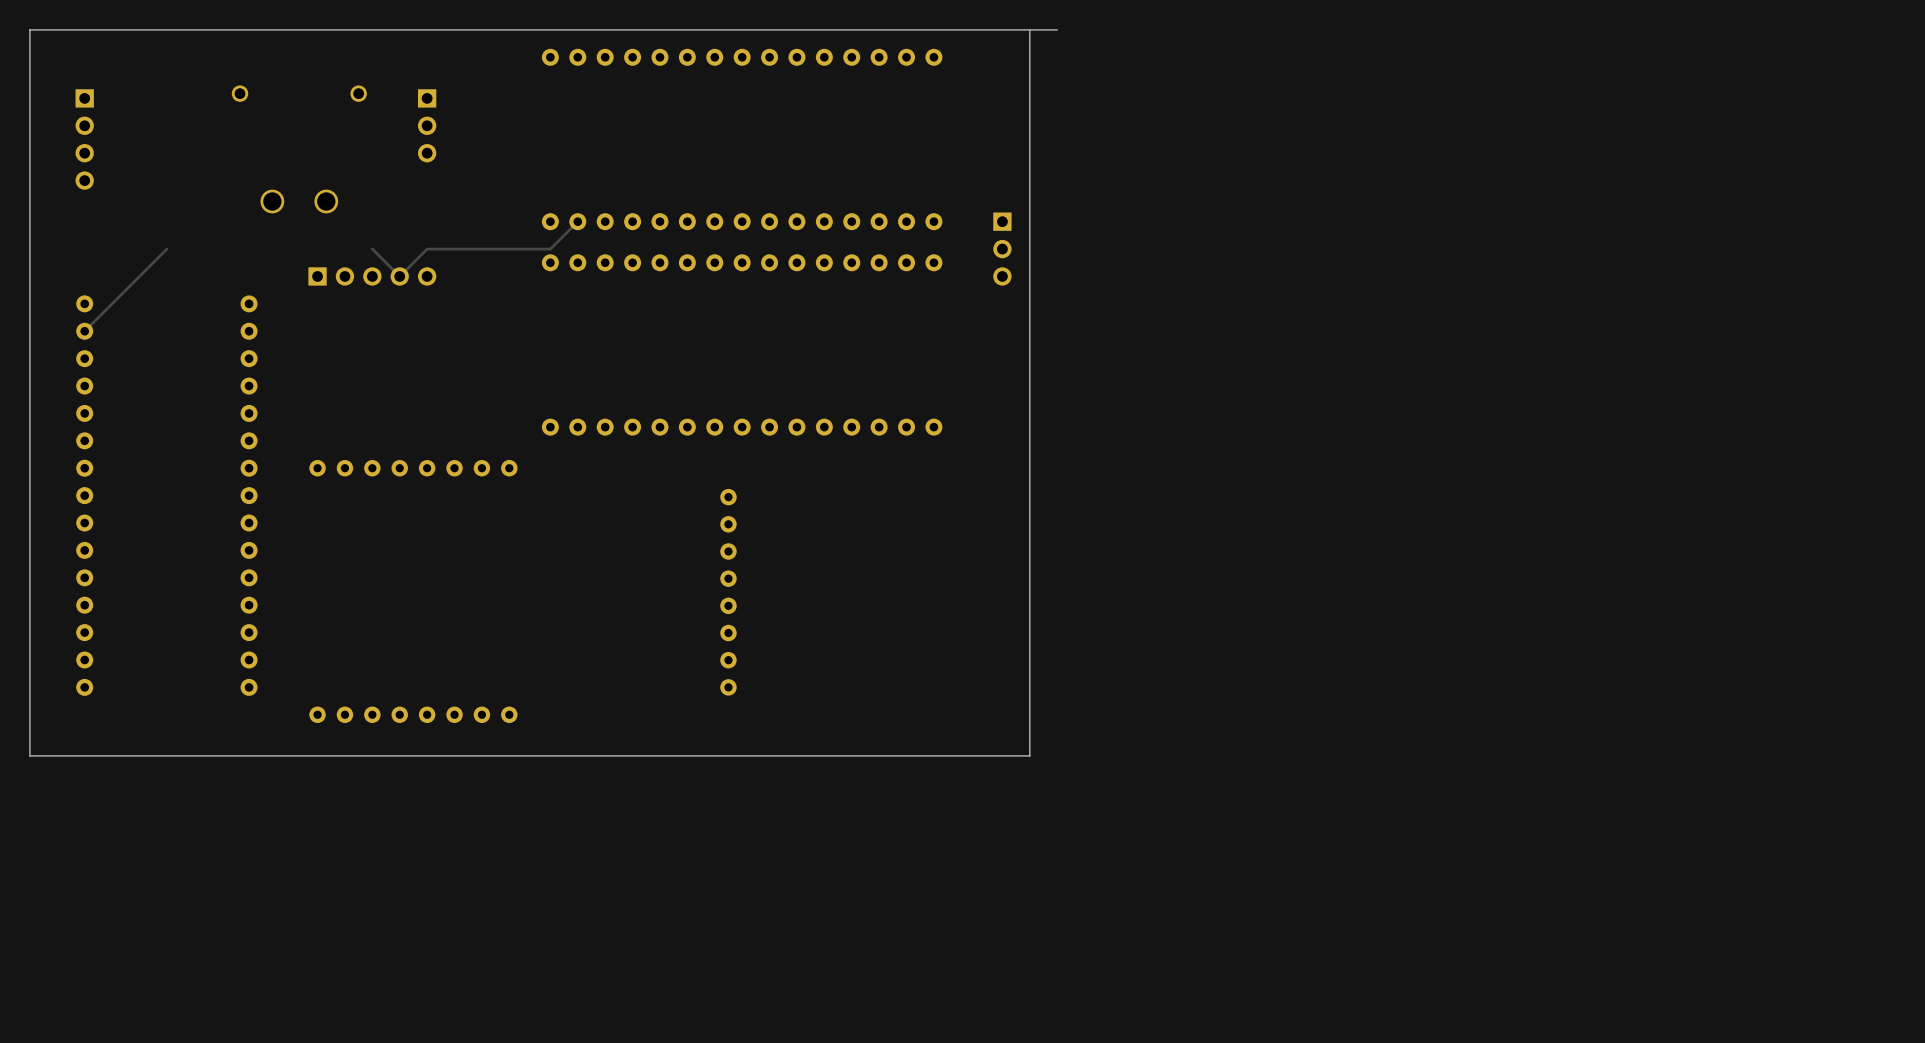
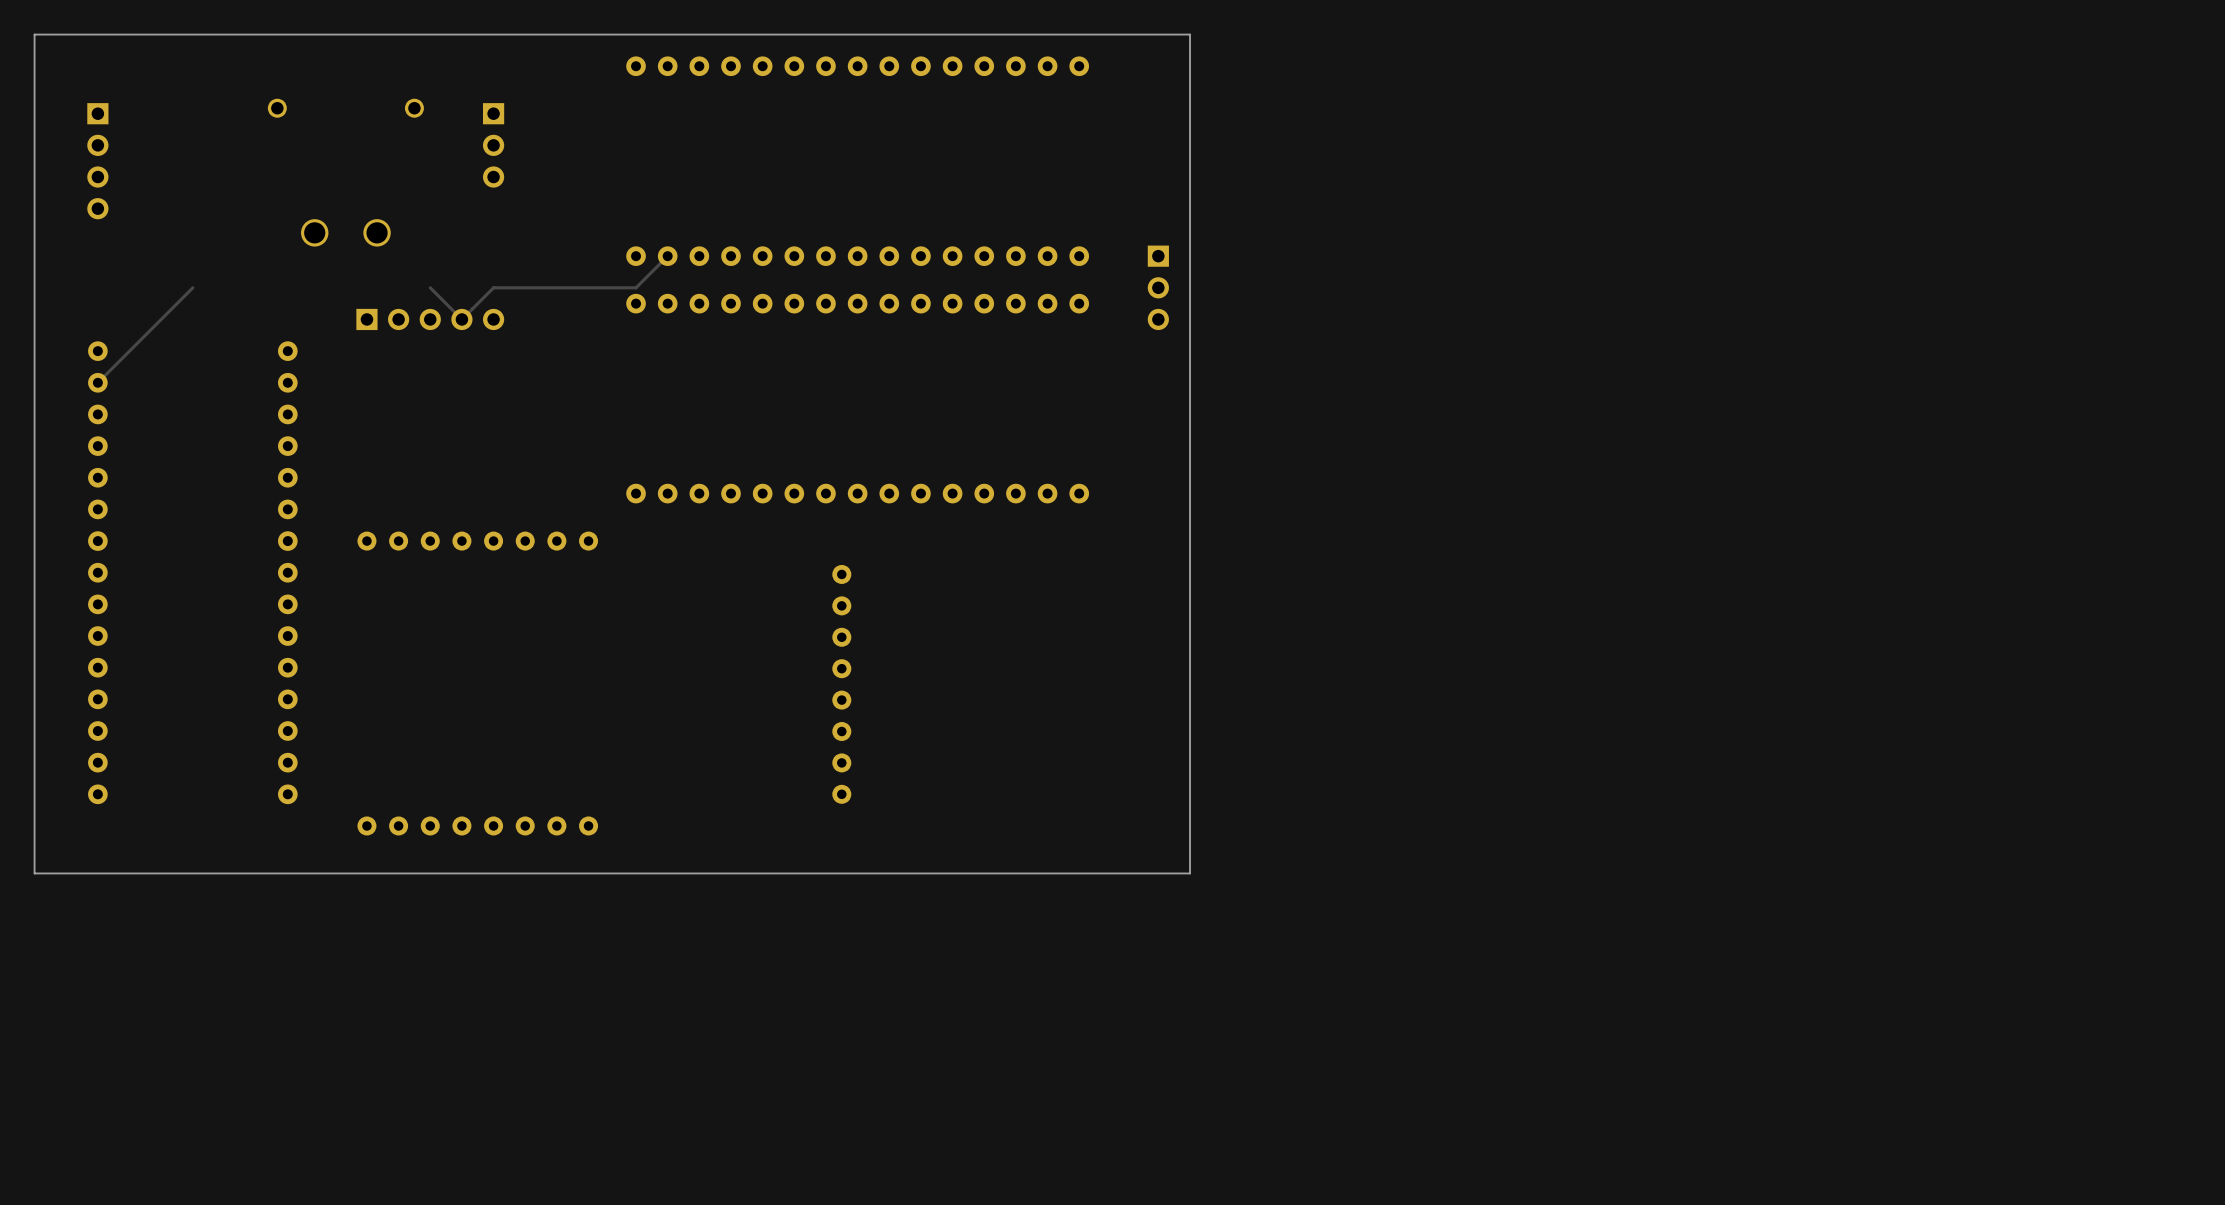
board edge: (1057, 29) (1029, 29) -> none

